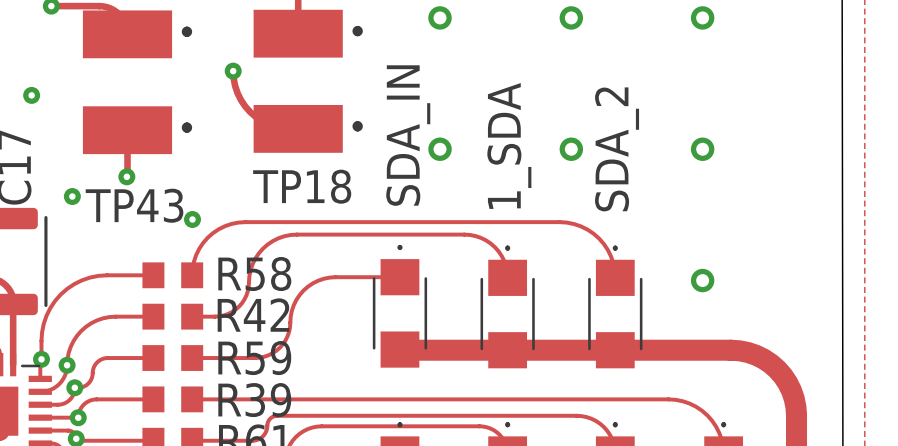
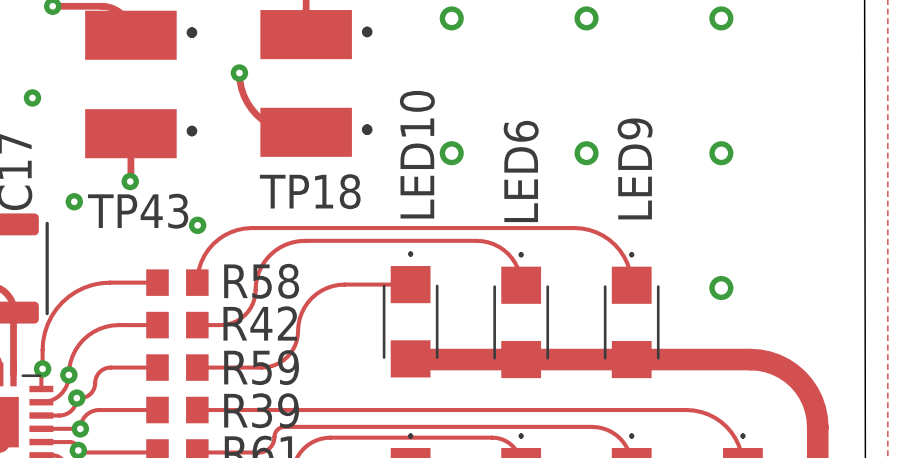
SDA_IN name: SDA_IN (408, 135) -> LED10 (417, 154)
1_SDA name: 1_SDA (509, 145) -> LED6 (521, 171)
SDA_2 name: SDA_2 (617, 149) -> LED9 (635, 168)

